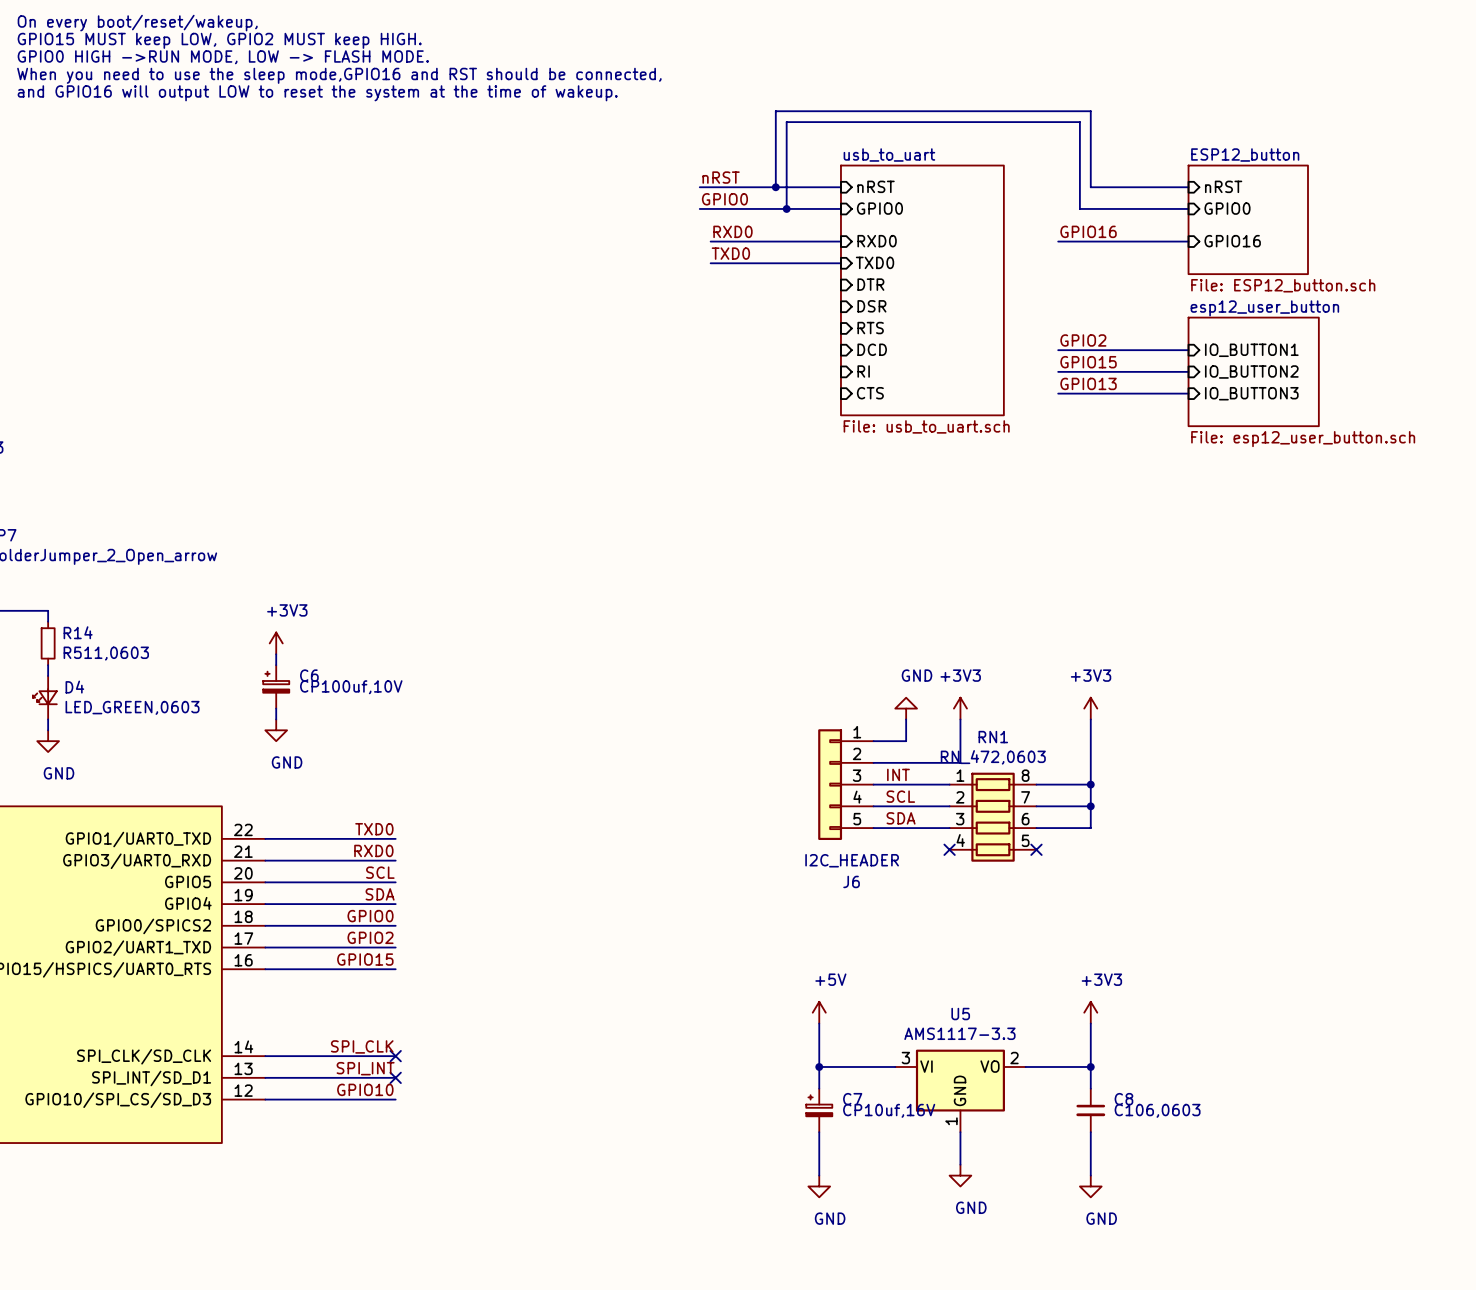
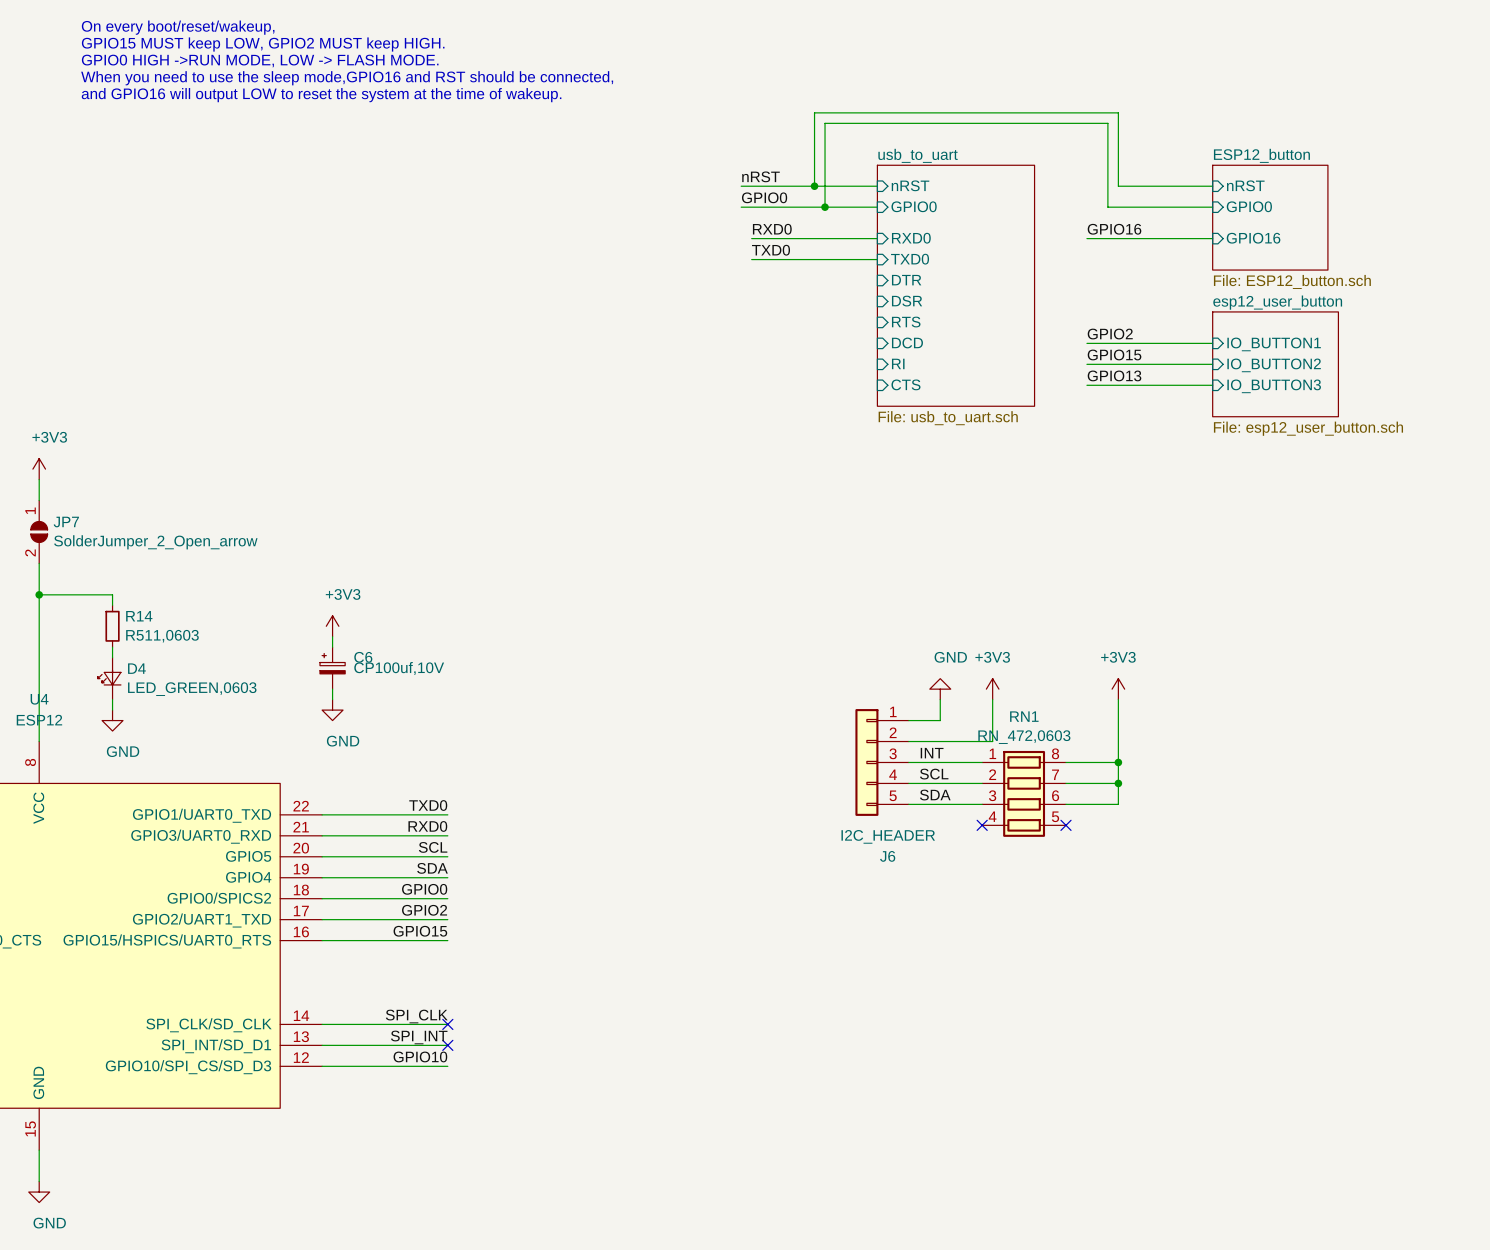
power symbol: +5V (819, 1012) -> none
power symbol: +3V3 (1090, 1012) -> none
wire: (819, 1023) (819, 1088) -> none
wire: (1090, 1023) (1090, 1088) -> none
wire: (819, 1066) (895, 1066) -> none
junction: (819, 1066) -> none
wire: (1025, 1066) (1090, 1066) -> none
junction: (1090, 1066) -> none
U5: AMS1117-3.3 (960, 1090) -> none
C7: CP10uf,16V (819, 1110) -> none
C8: C106,0603 (1090, 1110) -> none
wire: (819, 1132) (819, 1175) -> none
wire: (960, 1132) (960, 1164) -> none
wire: (1090, 1132) (1090, 1175) -> none
power symbol: GND (960, 1175) -> none
power symbol: GND (819, 1186) -> none
power symbol: GND (1090, 1186) -> none

